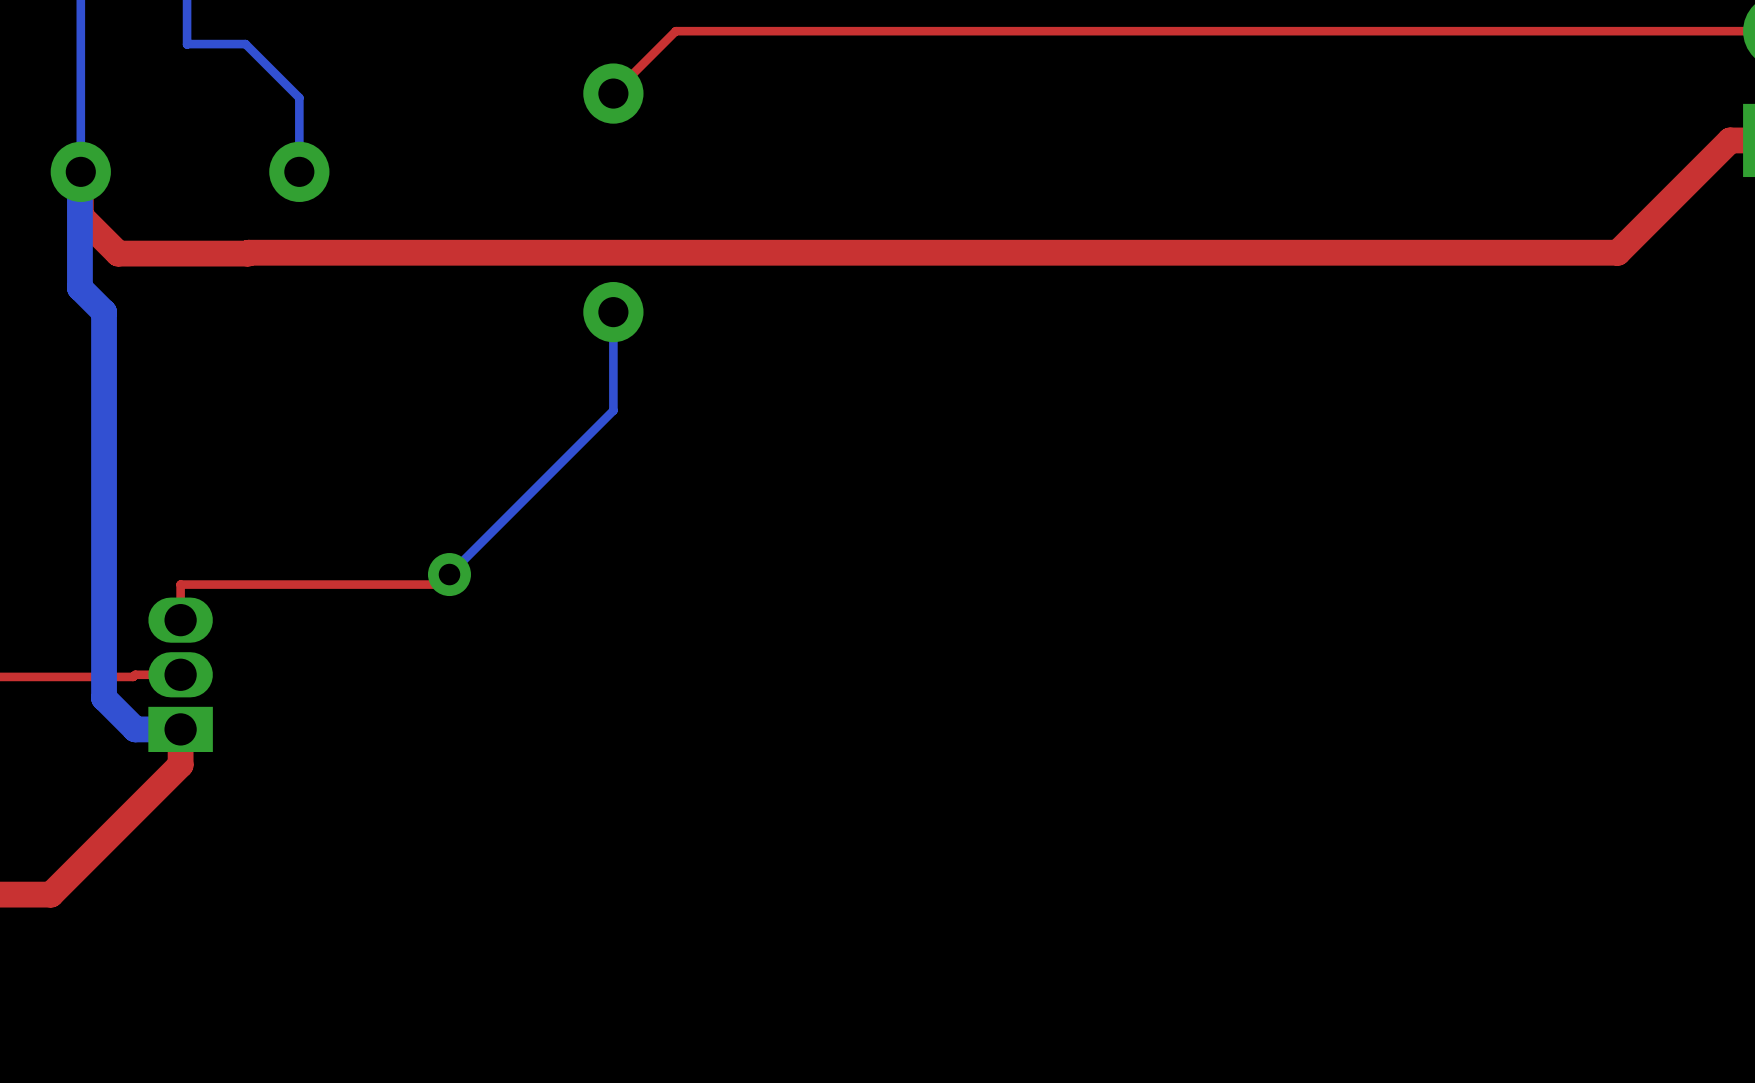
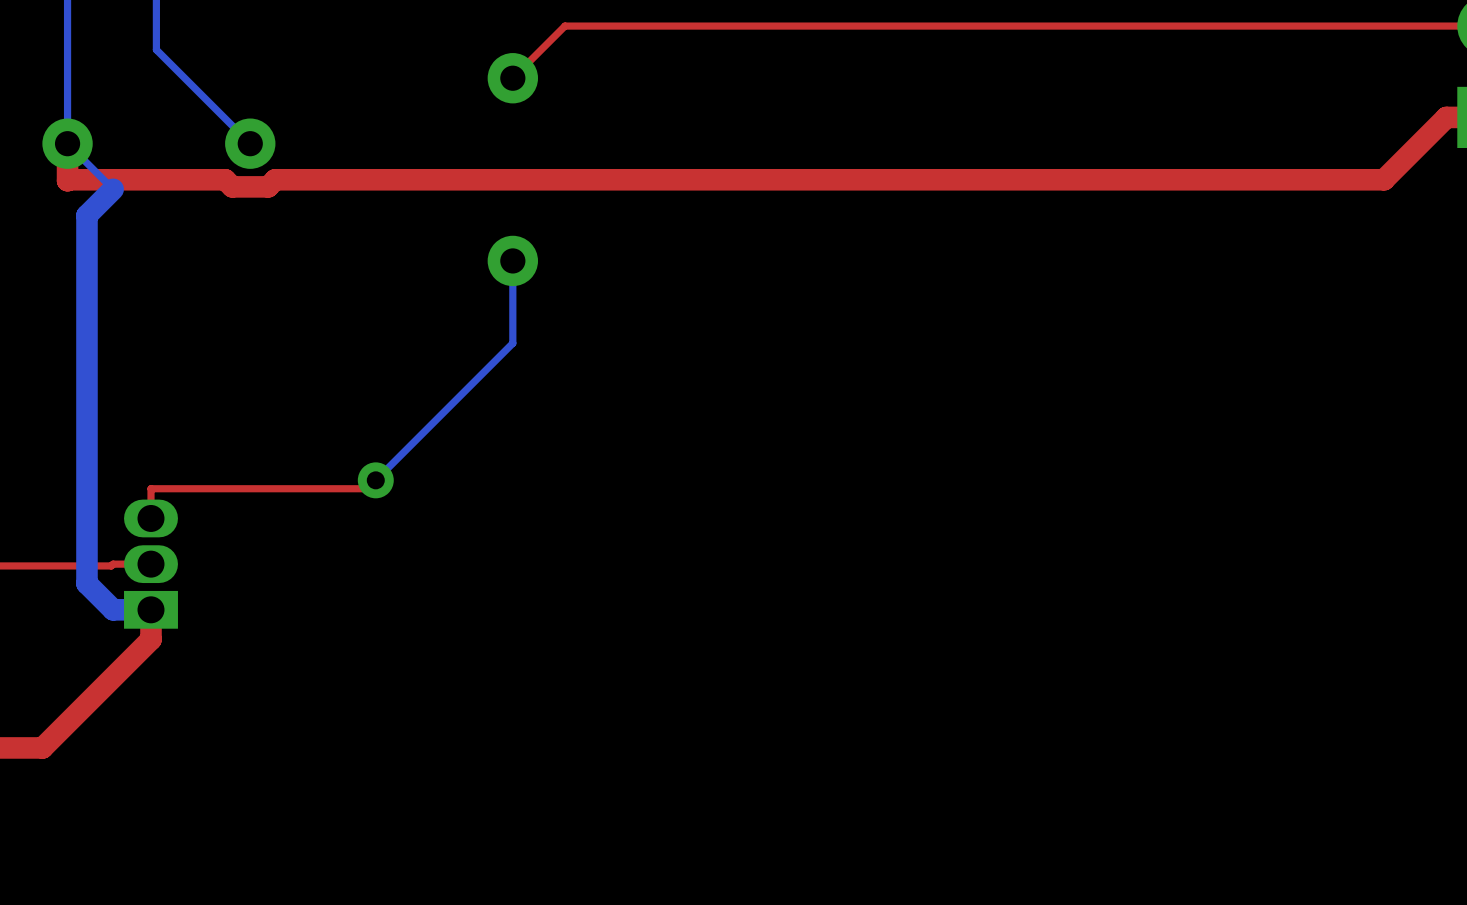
bottom track: (187, 44) (245, 44) (299, 97) (299, 171) -> (156, 37) (156, 49) (250, 143)
bottom track: (80, 171) (79, 288) (104, 312) -> (67, 143) (113, 189) (86, 215) (86, 260)
top track: (1655, 215) (1617, 252) (118, 253) (80, 216) -> (1384, 179) (275, 179) (268, 186) (232, 186) (225, 179) (67, 180)

